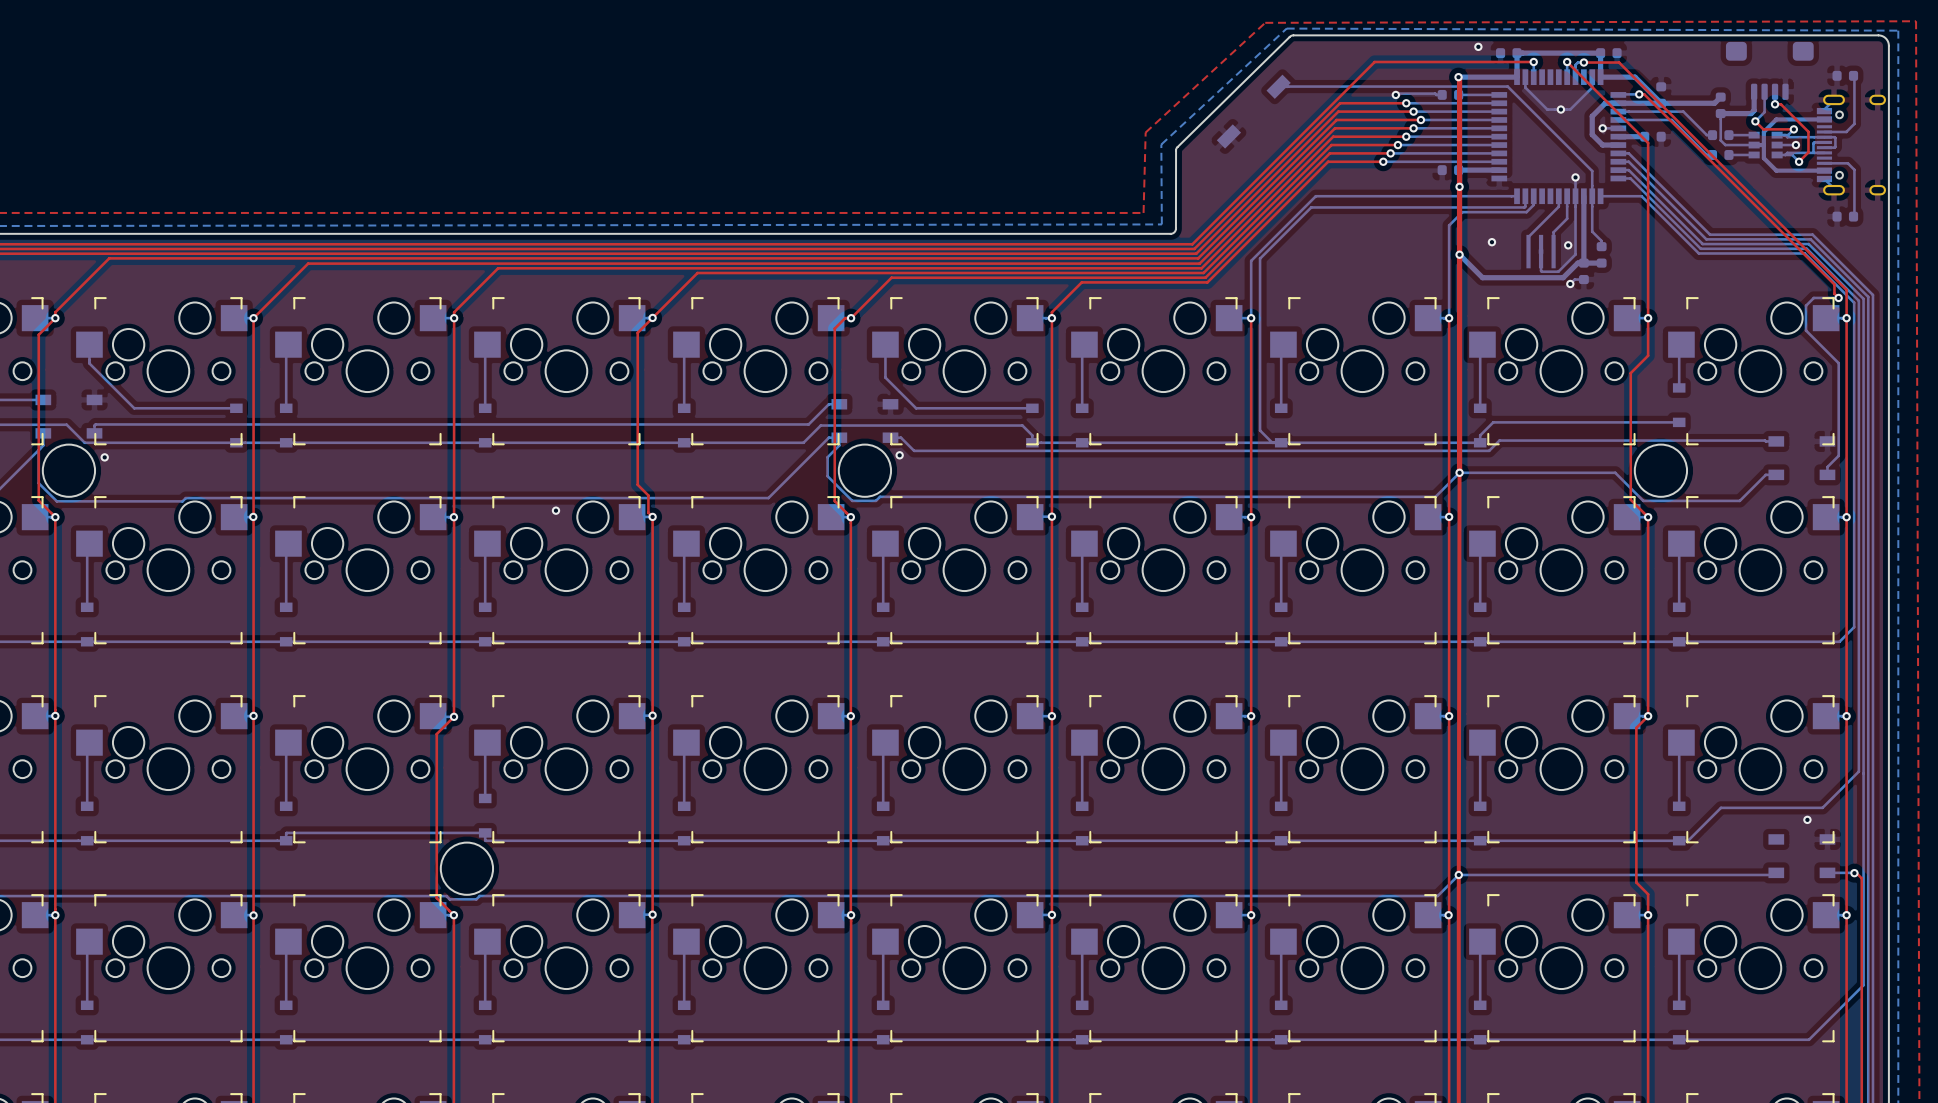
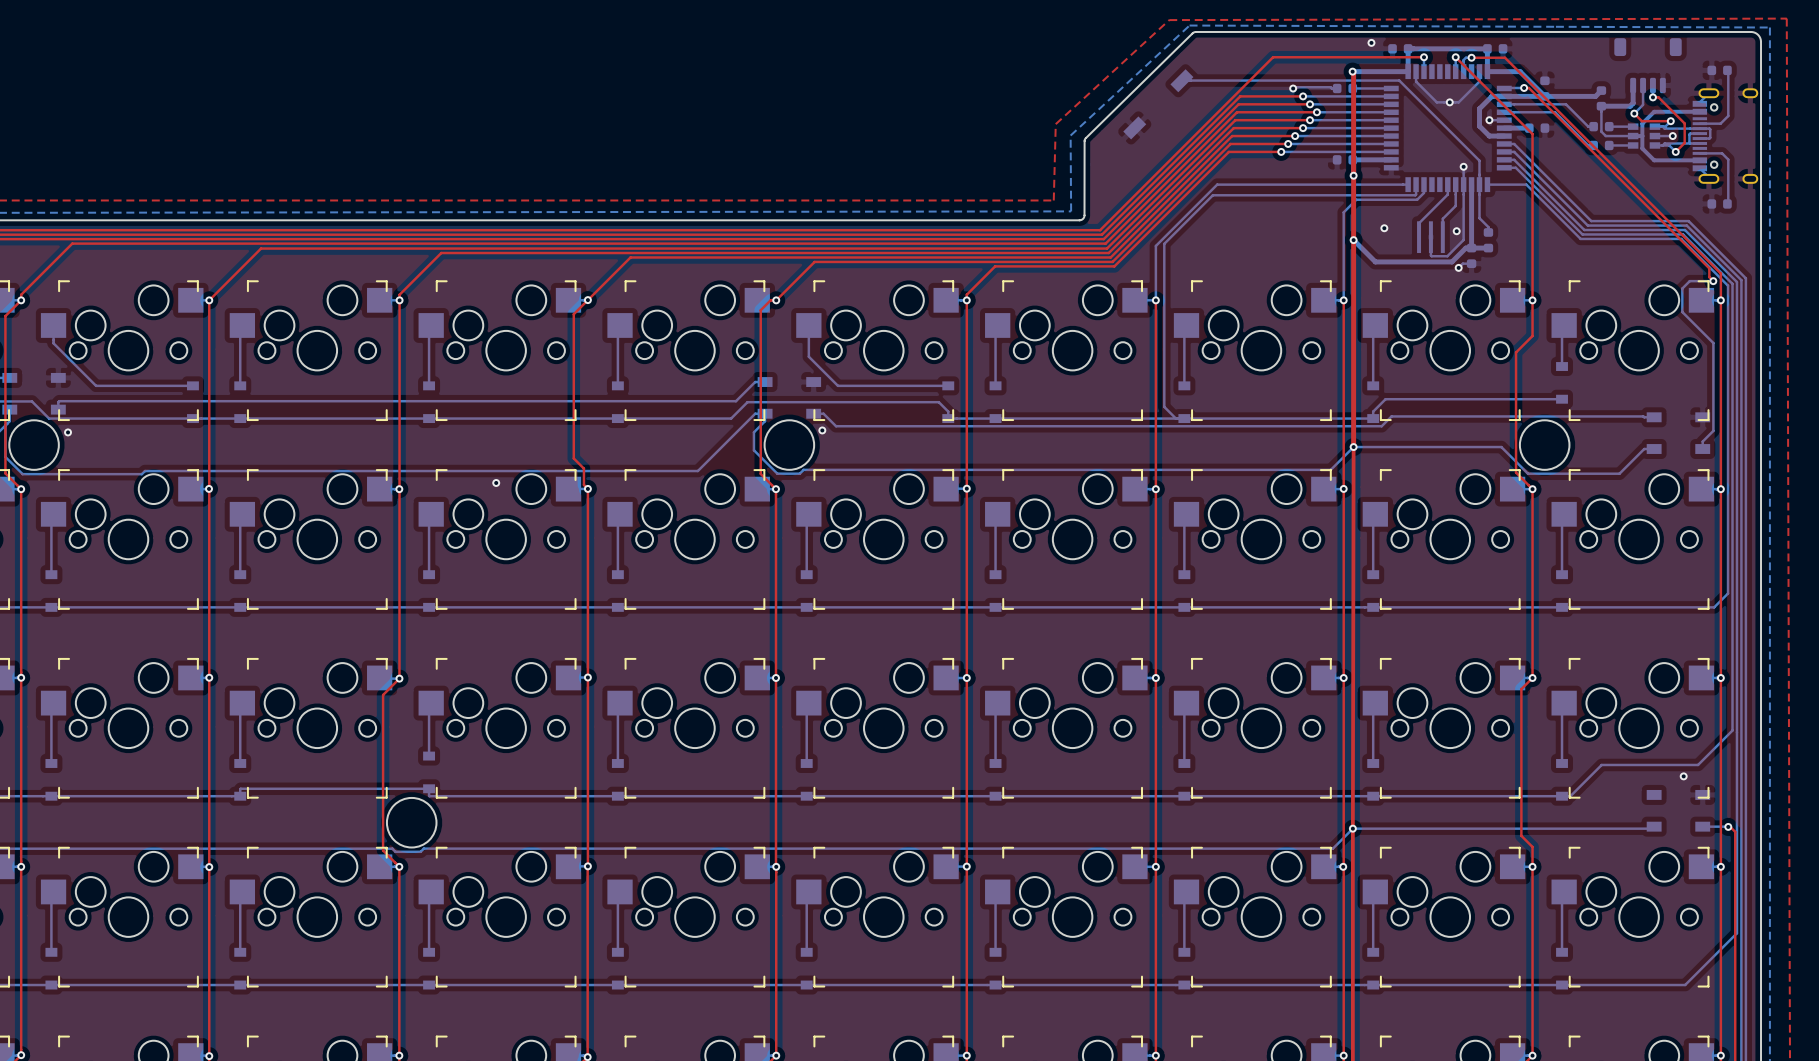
part footprint: [1725, 41, 1814, 100] -> [1614, 38, 1682, 94]

